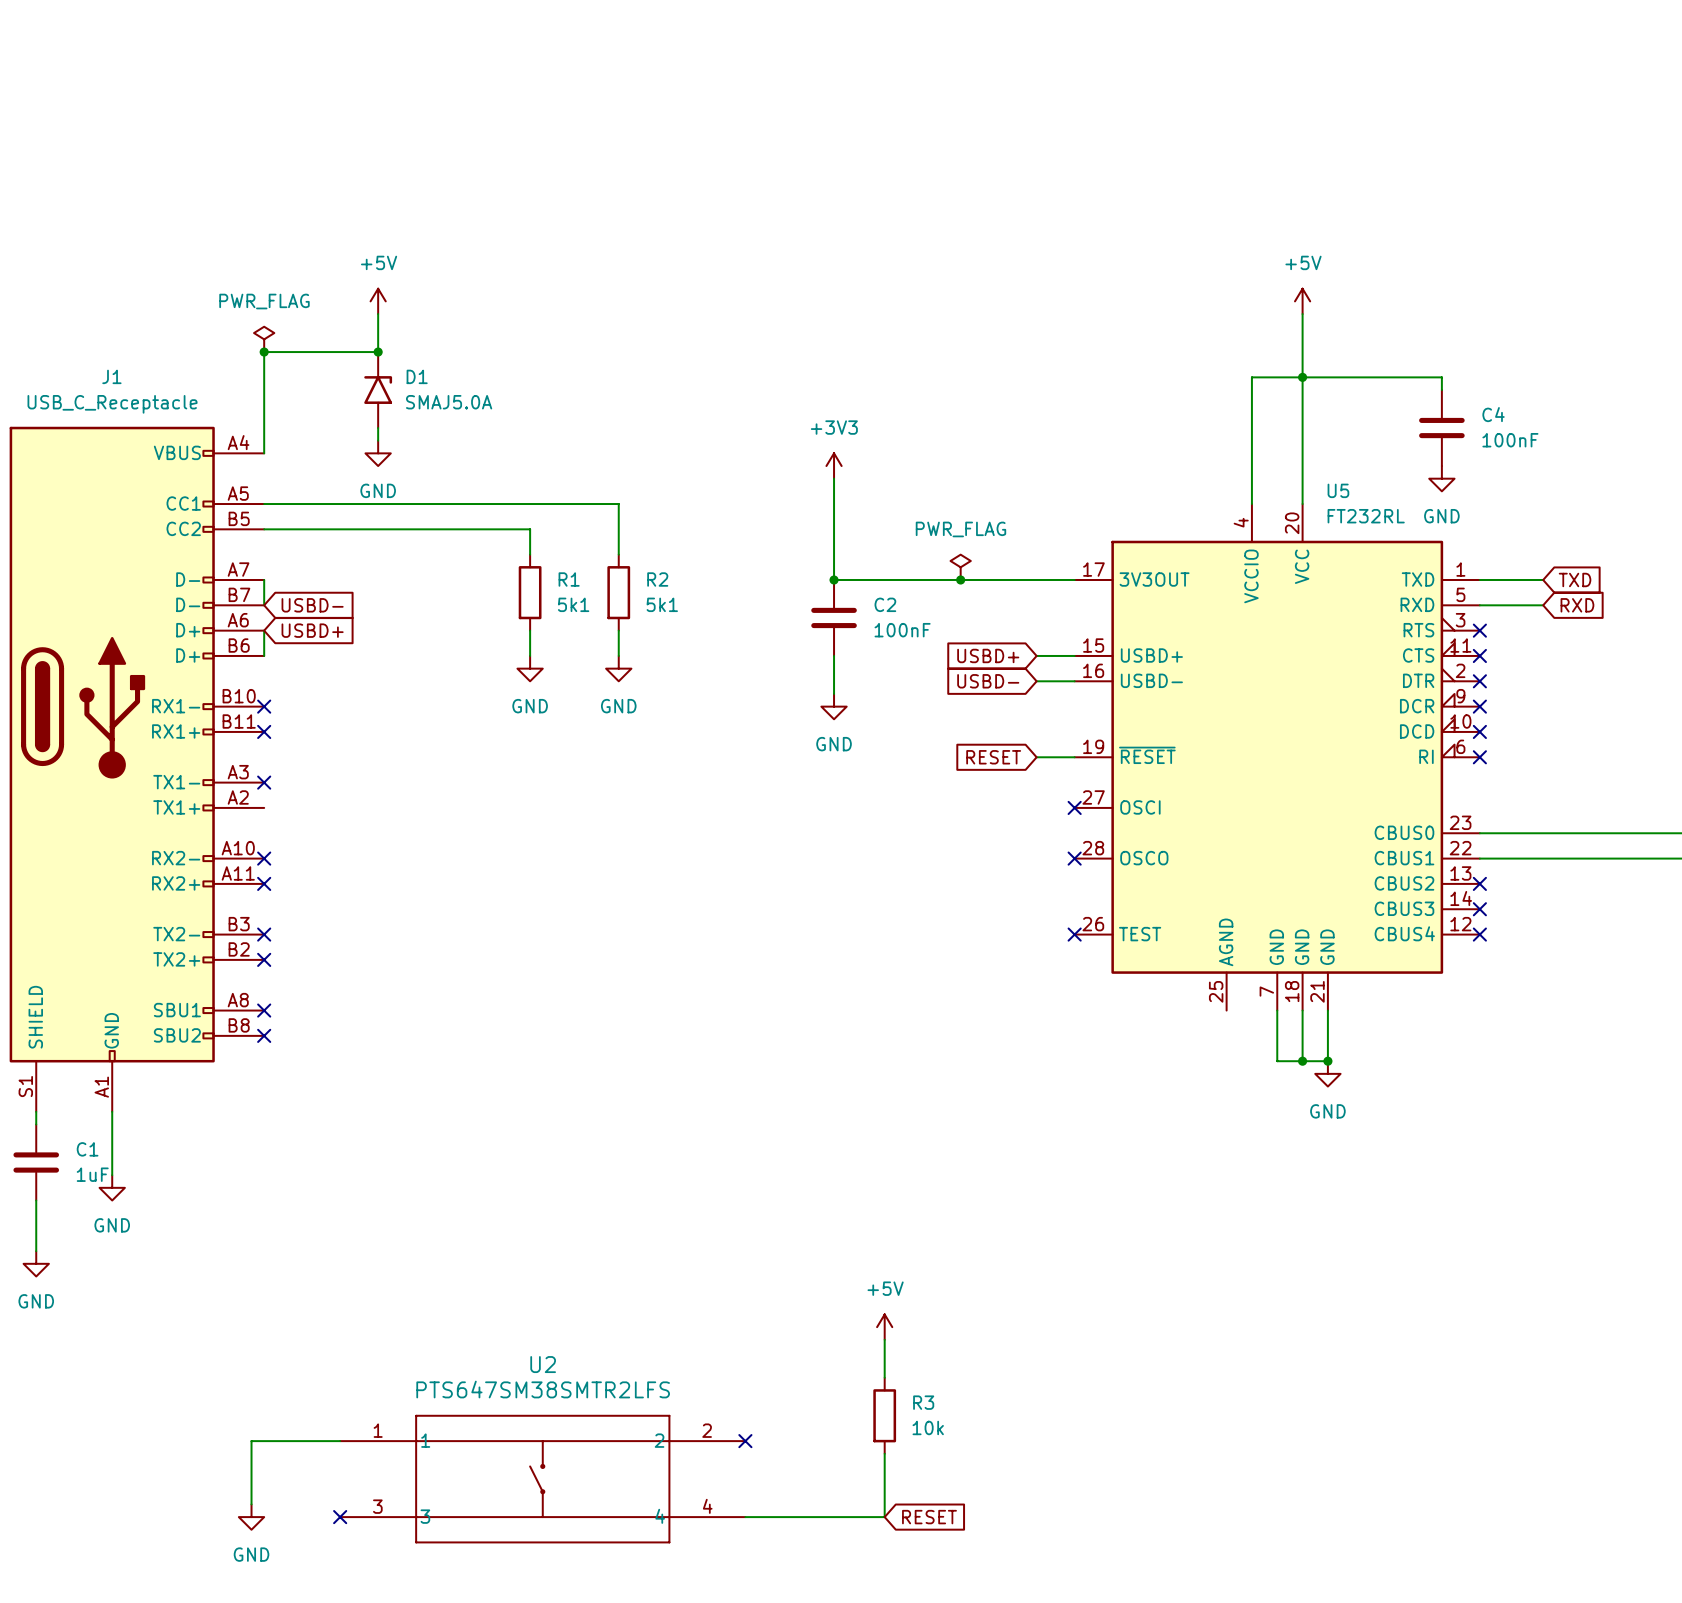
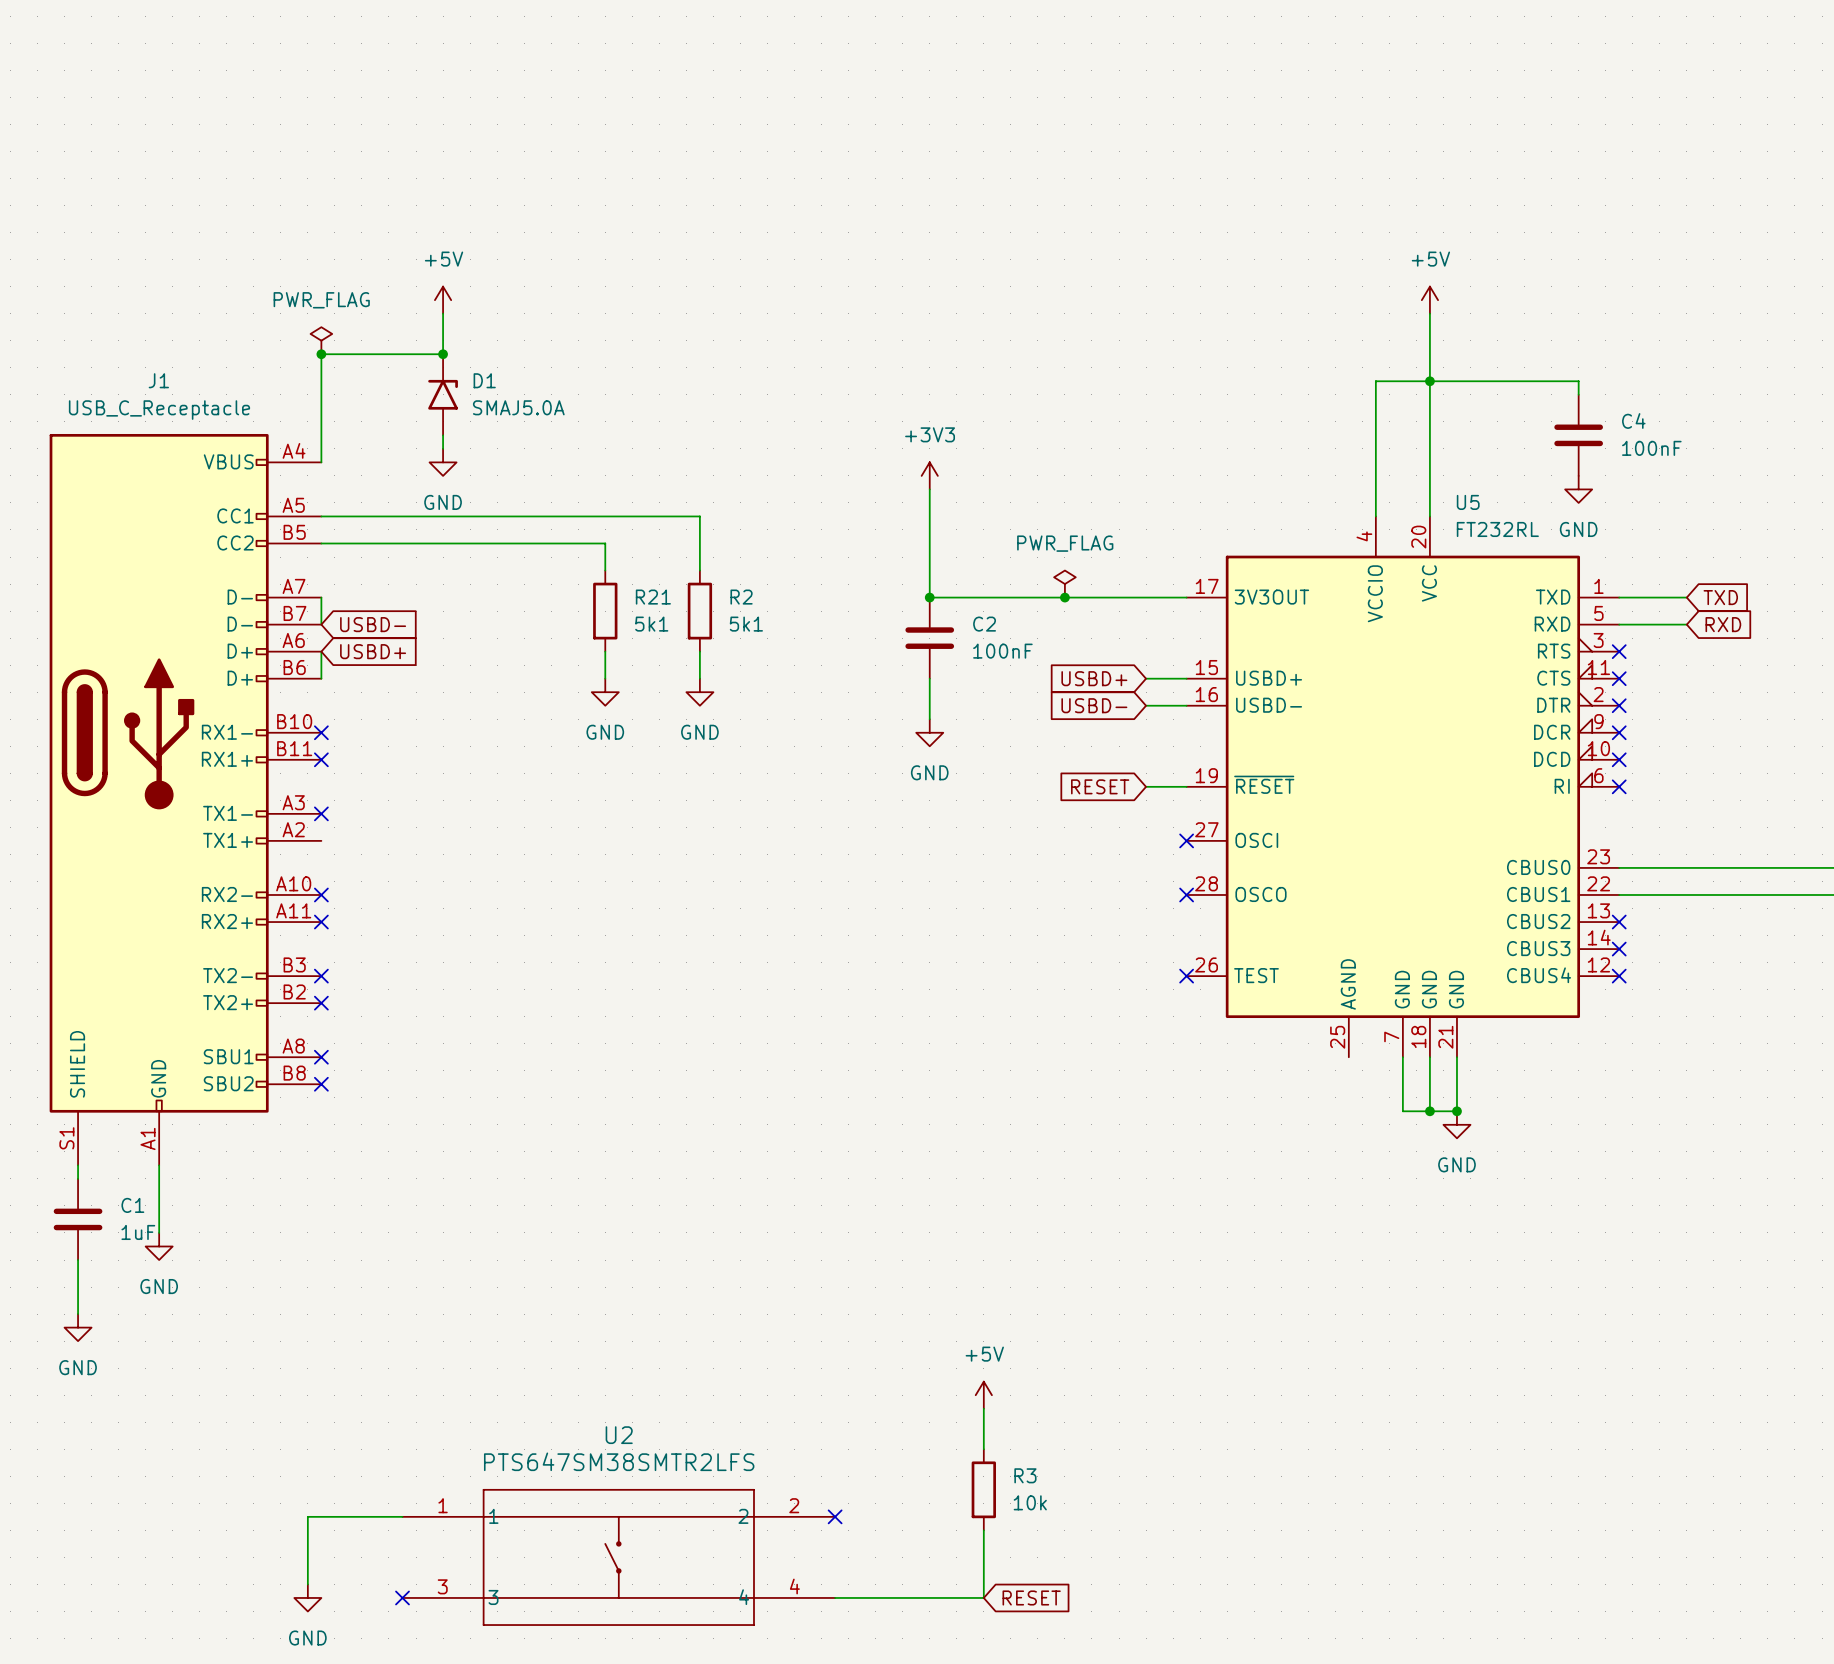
R1 name: R1 (569, 579) -> R21 (653, 597)

